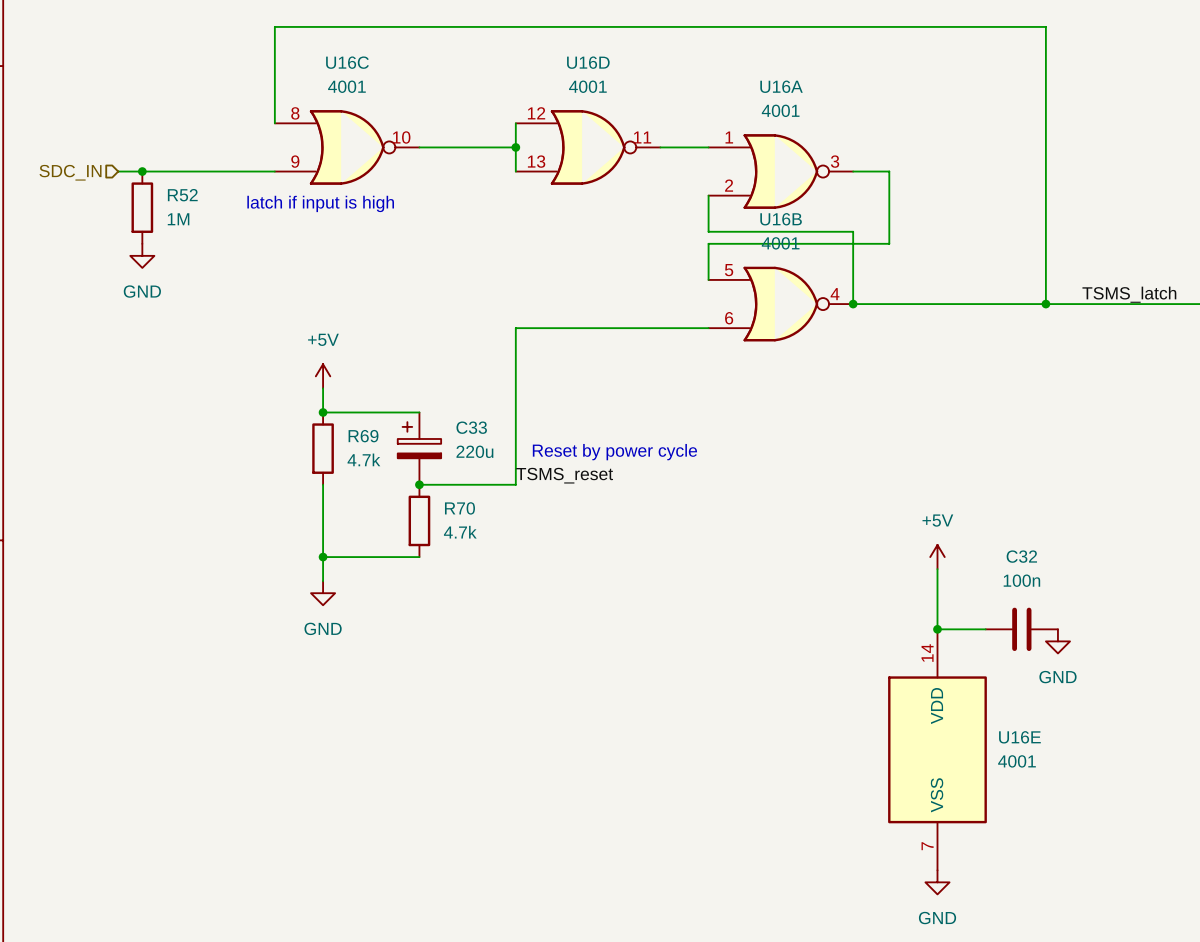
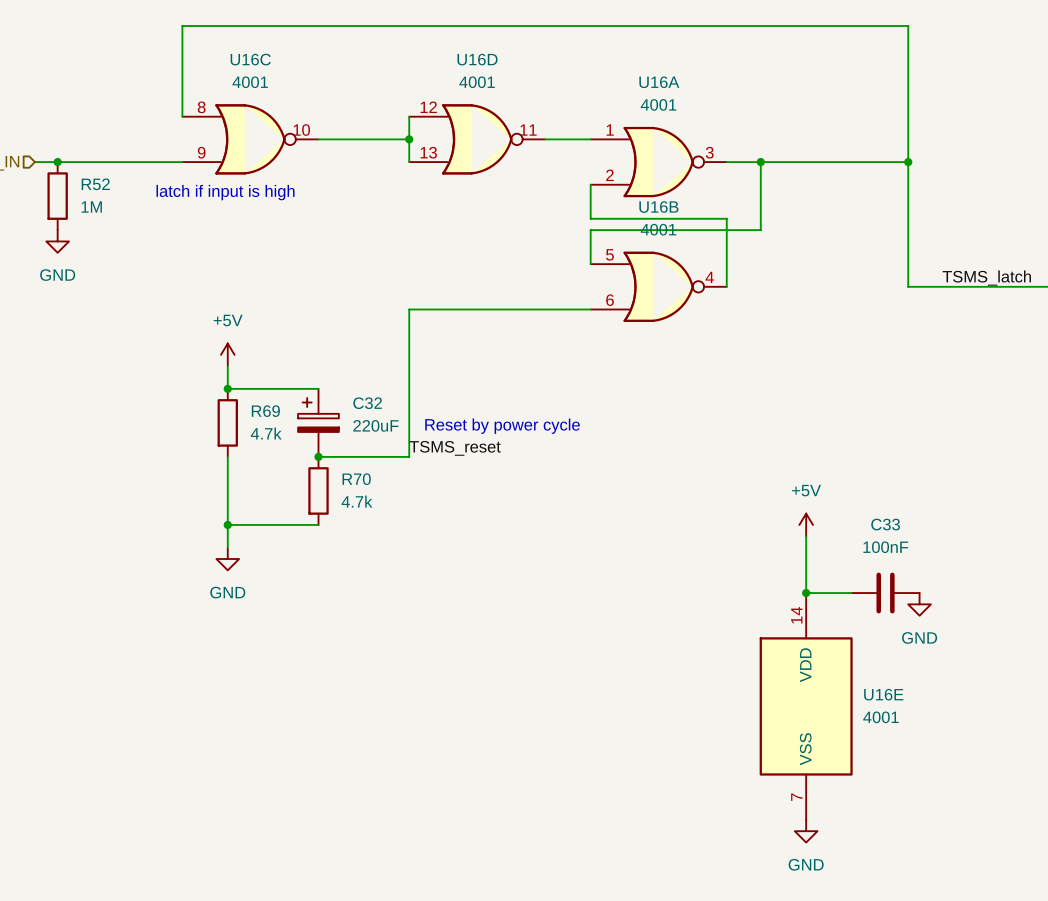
wire: none -> (760, 162) (908, 162)
junction: none -> (760, 162)
junction: none -> (908, 162)
wire: (853, 304) (1045, 304) -> none
junction: (853, 304) -> none
junction: (1045, 304) -> none
C33 name: C33 (471, 427) -> C32 (367, 403)
C33 value: 220u (474, 451) -> 220uF (375, 425)
C32 name: C32 (1021, 556) -> C33 (885, 524)
C32 value: 100n (1021, 580) -> 100nF (885, 547)

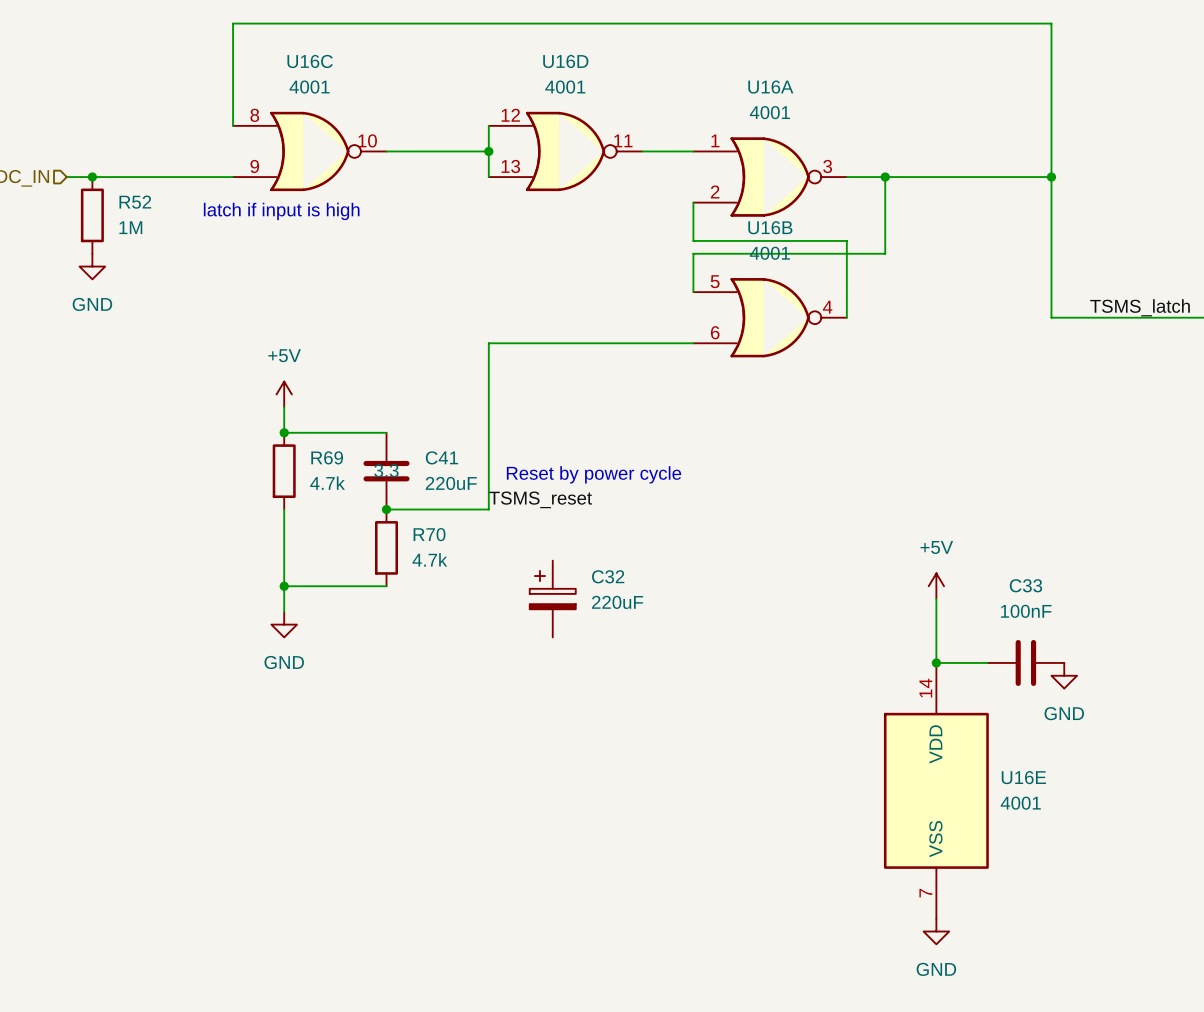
C32 position: (318, 422) -> (552, 599)
C41: none -> 220uF (386, 471)

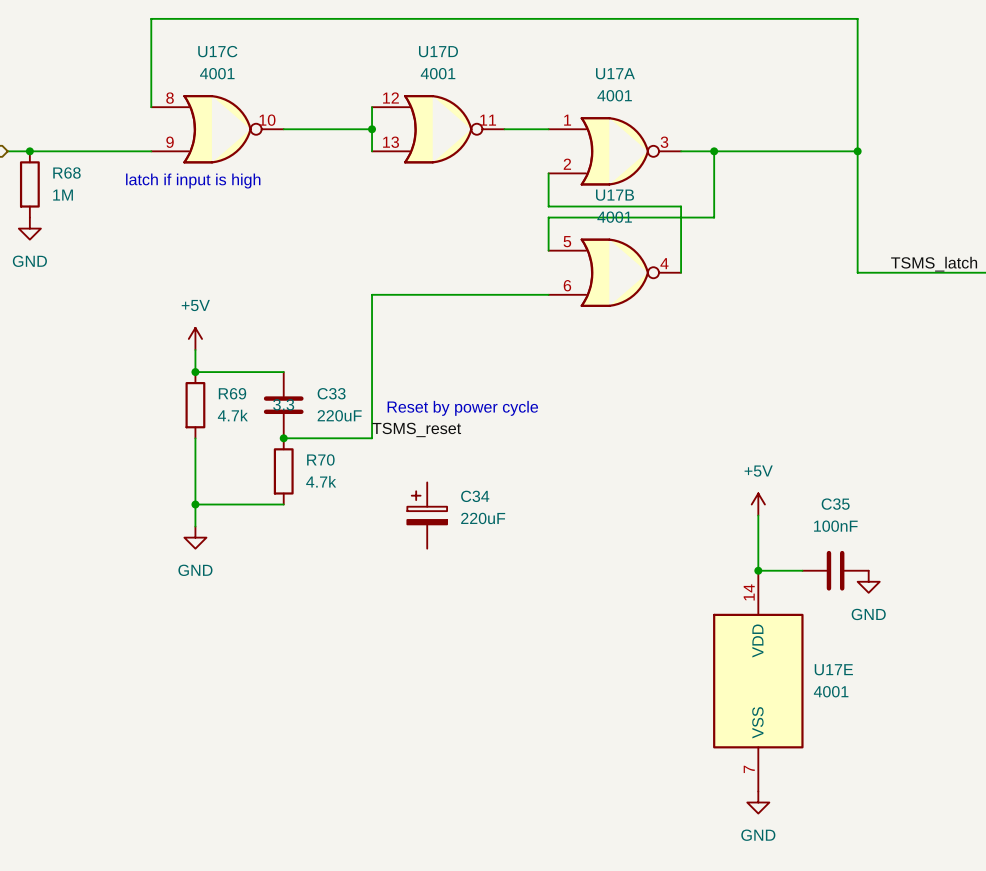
U16C name: U16C (310, 61) -> U17C (217, 51)
U16D name: U16D (565, 61) -> U17D (438, 51)
U16A name: U16A (770, 87) -> U17A (615, 73)
R52 name: R52 (135, 202) -> R68 (66, 172)
U16B name: U16B (770, 227) -> U17B (615, 195)
C41 name: C41 (441, 457) -> C33 (331, 393)
C32 name: C32 (608, 576) -> C34 (475, 496)
C33 name: C33 (1025, 585) -> C35 (835, 504)
U16E name: U16E (1023, 777) -> U17E (833, 669)

